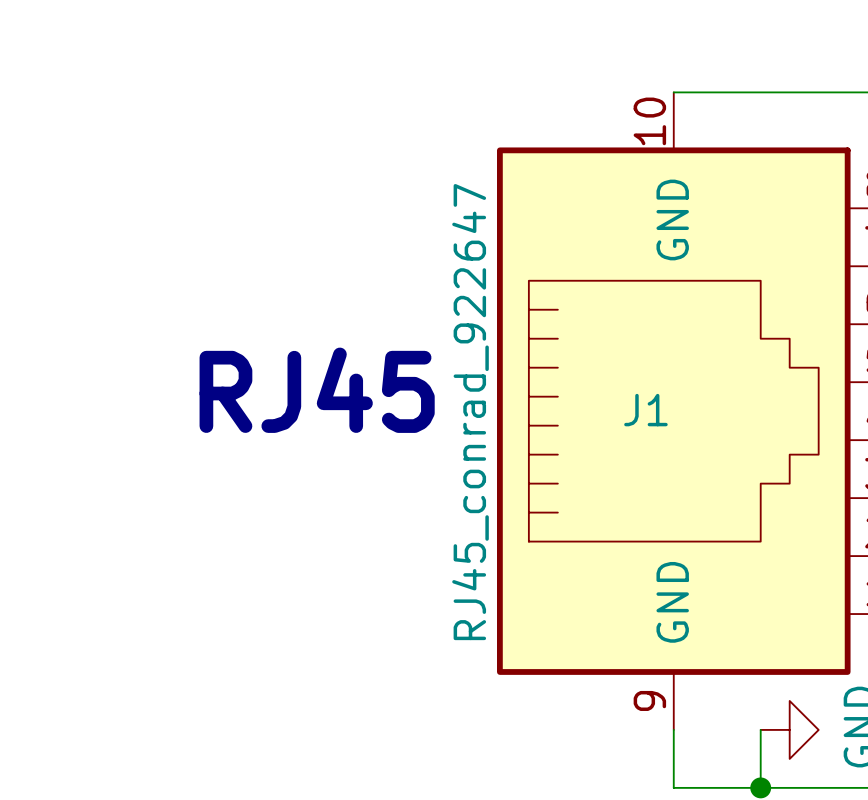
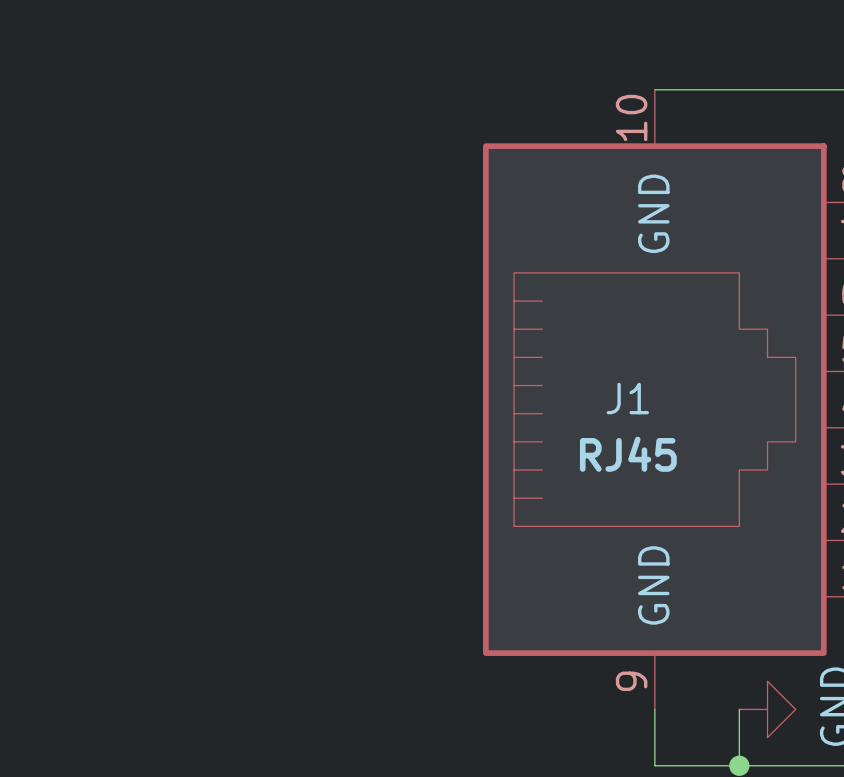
text: RJ45 (317, 390) -> none
J1 value: RJ45_conrad_922647 (470, 412) -> RJ45 (628, 454)

